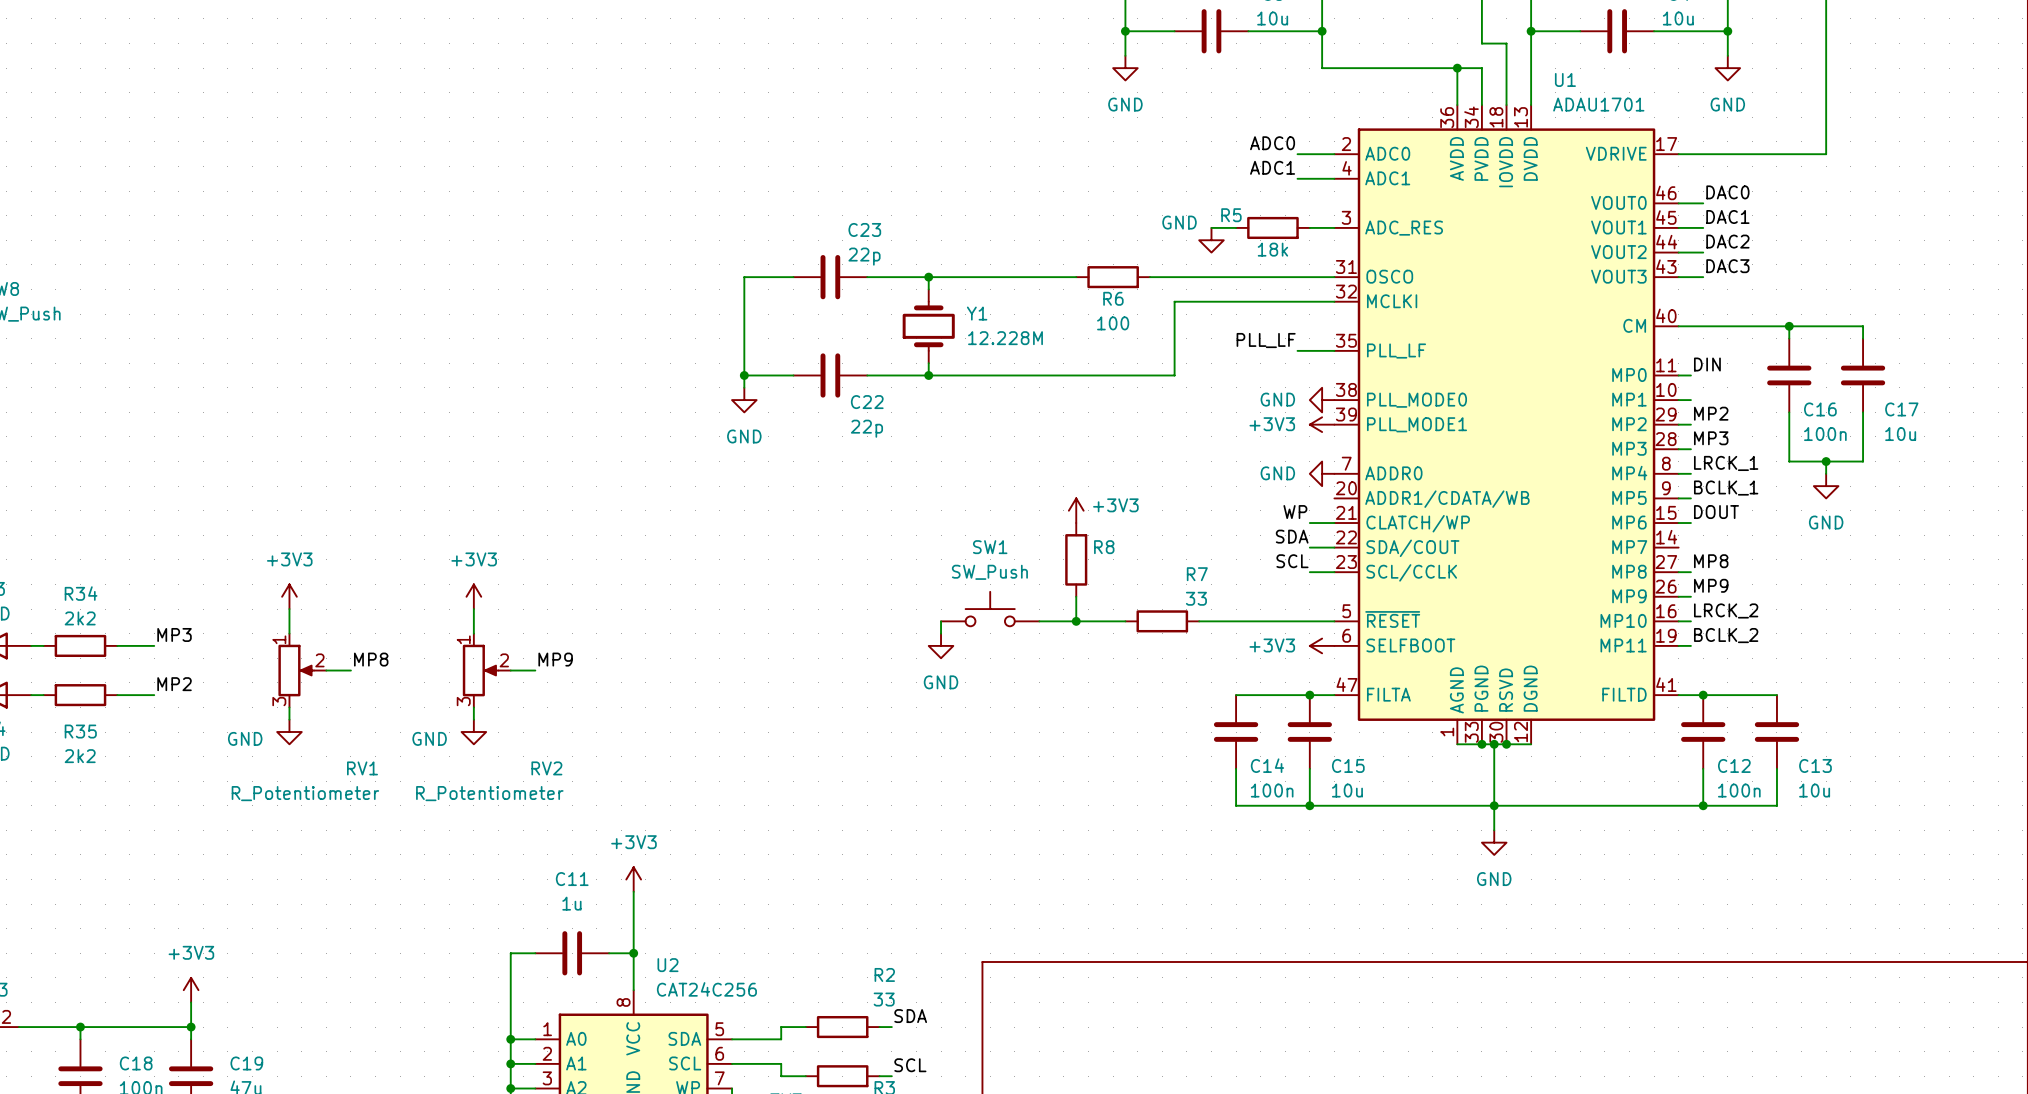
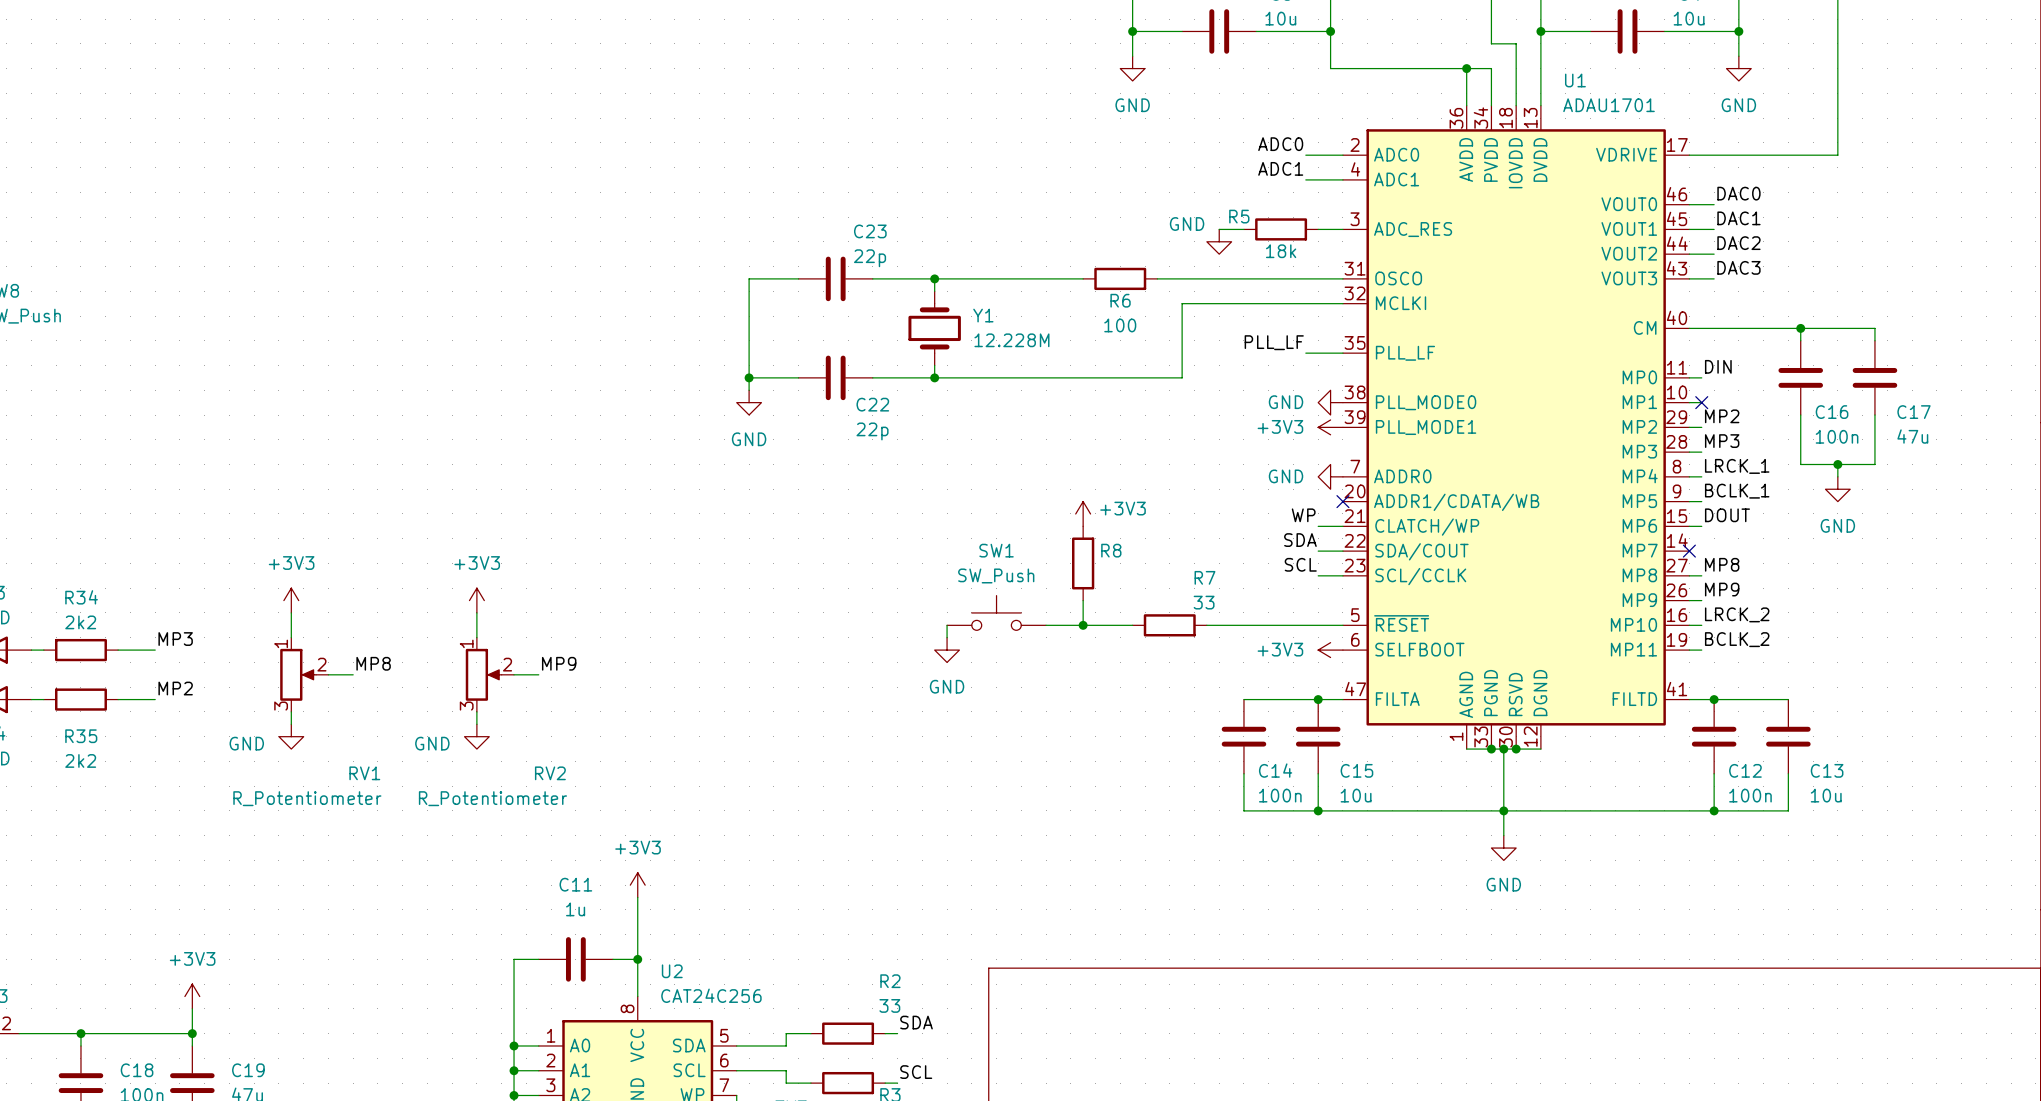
no-connect mark: none -> (1701, 402)
C17 value: 10u (1900, 434) -> 47u (1912, 436)
no-connect mark: none -> (1342, 501)
no-connect mark: none -> (1689, 551)

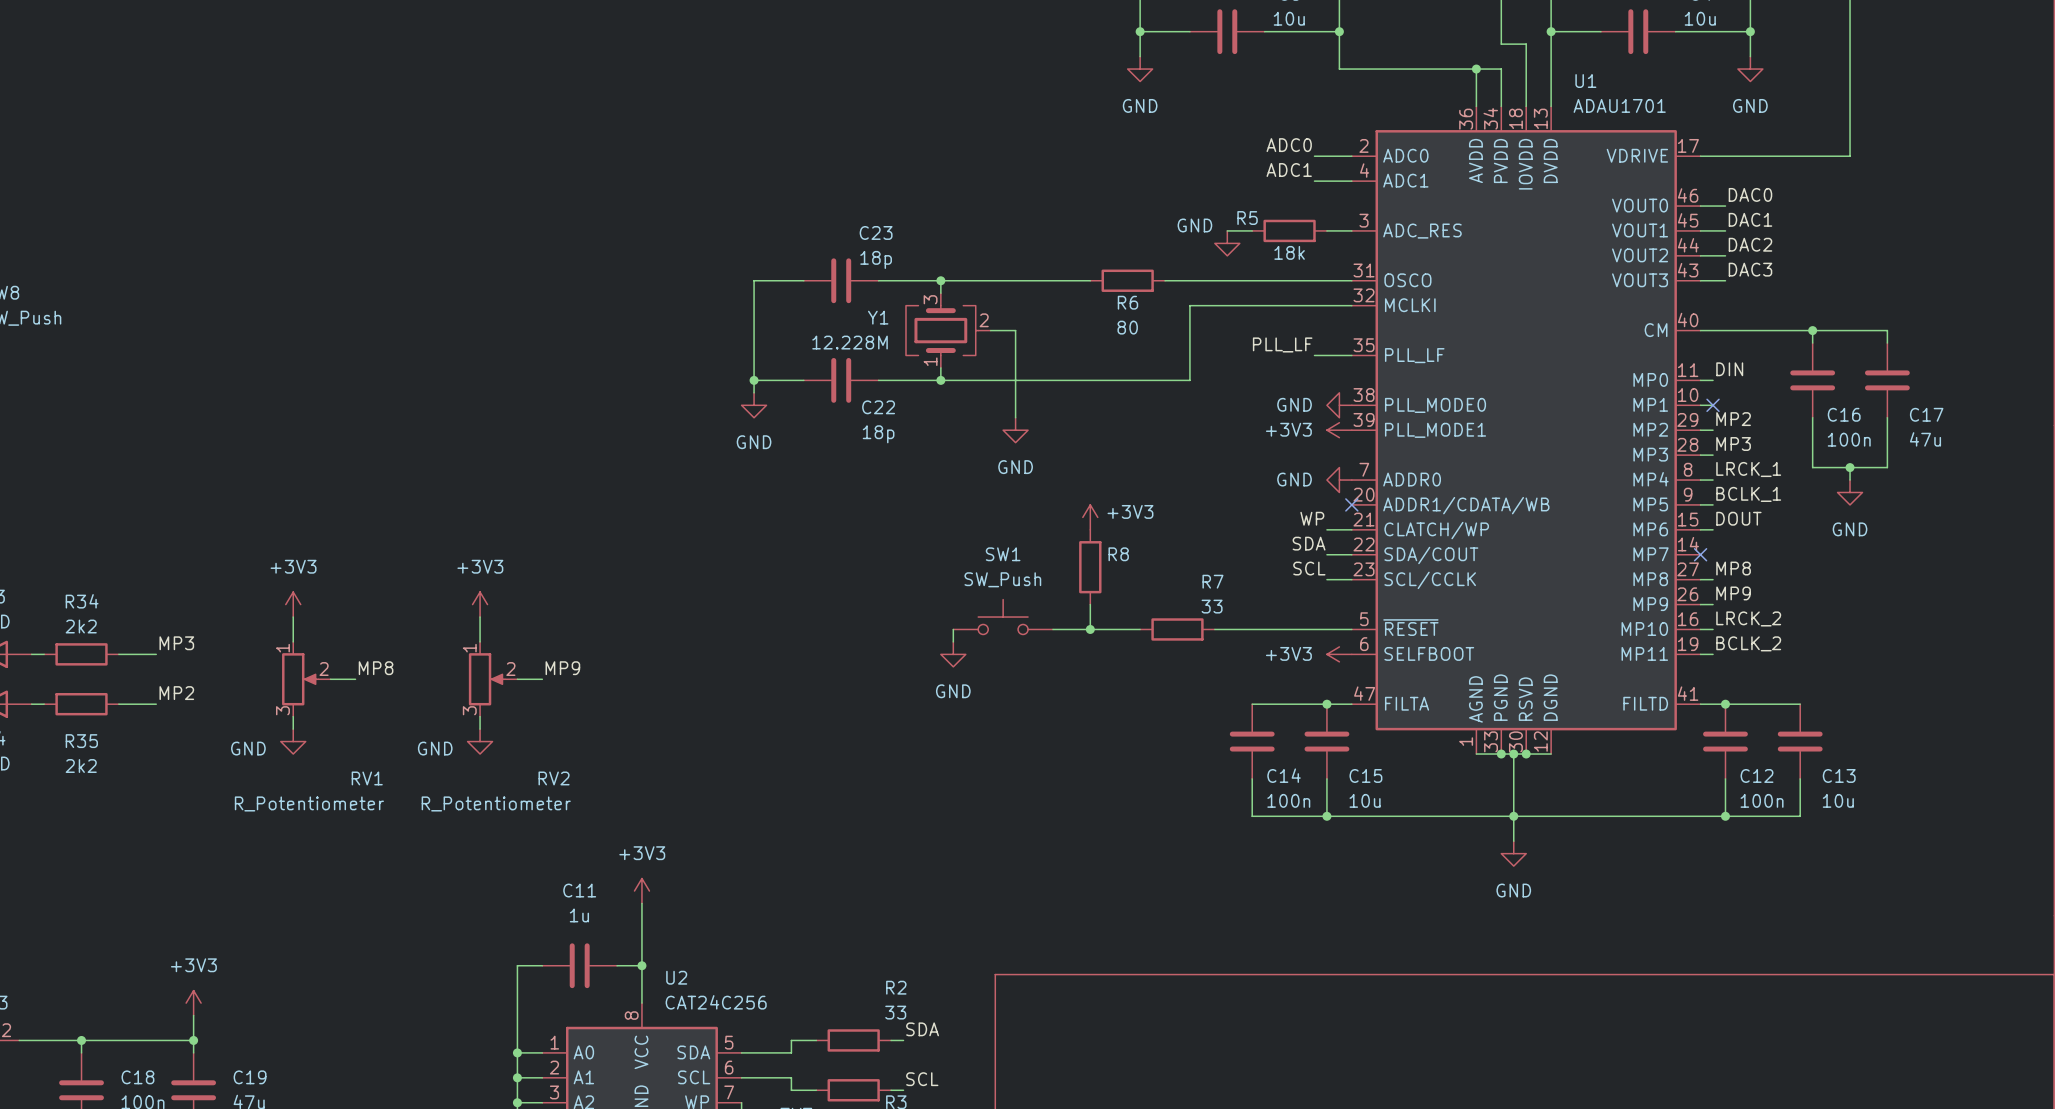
C23 value: 22p (870, 258) -> 18p (876, 259)
Y1 symbol: [908, 291, 961, 366] -> [905, 293, 991, 368]
Y1 name position: Y1 (983, 315) -> Y1 (878, 317)
R6 value: 100 (1120, 325) -> 80 (1127, 327)
wire: none -> (990, 330) (1015, 330) (1015, 417)
Y1 value position: 12.228M (1011, 340) -> 12.228M (850, 342)
power symbol: none -> GND (1015, 430)
C22 value: 22p (872, 431) -> 18p (878, 434)

